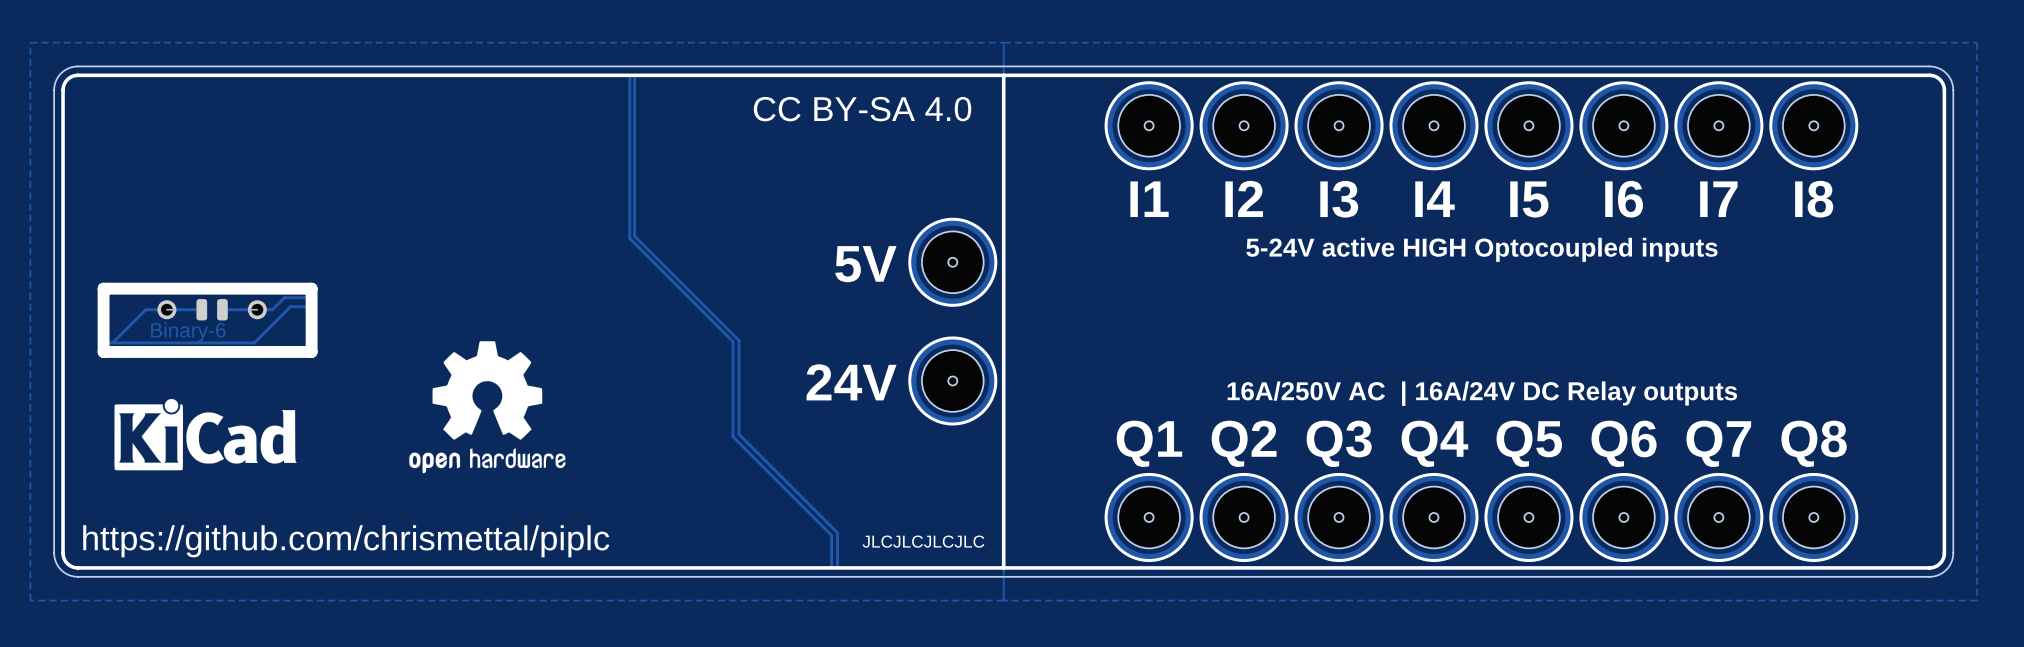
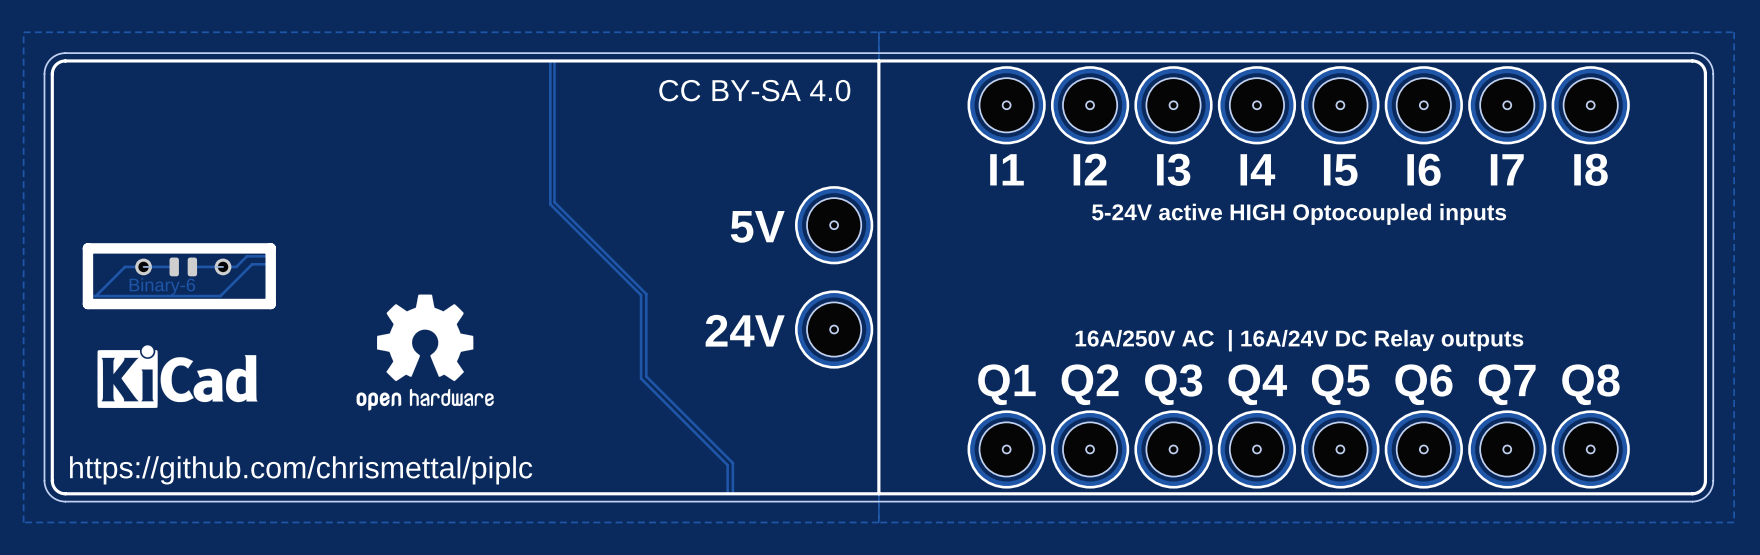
text: JLCJLCJLCJLC (923, 541) -> none

